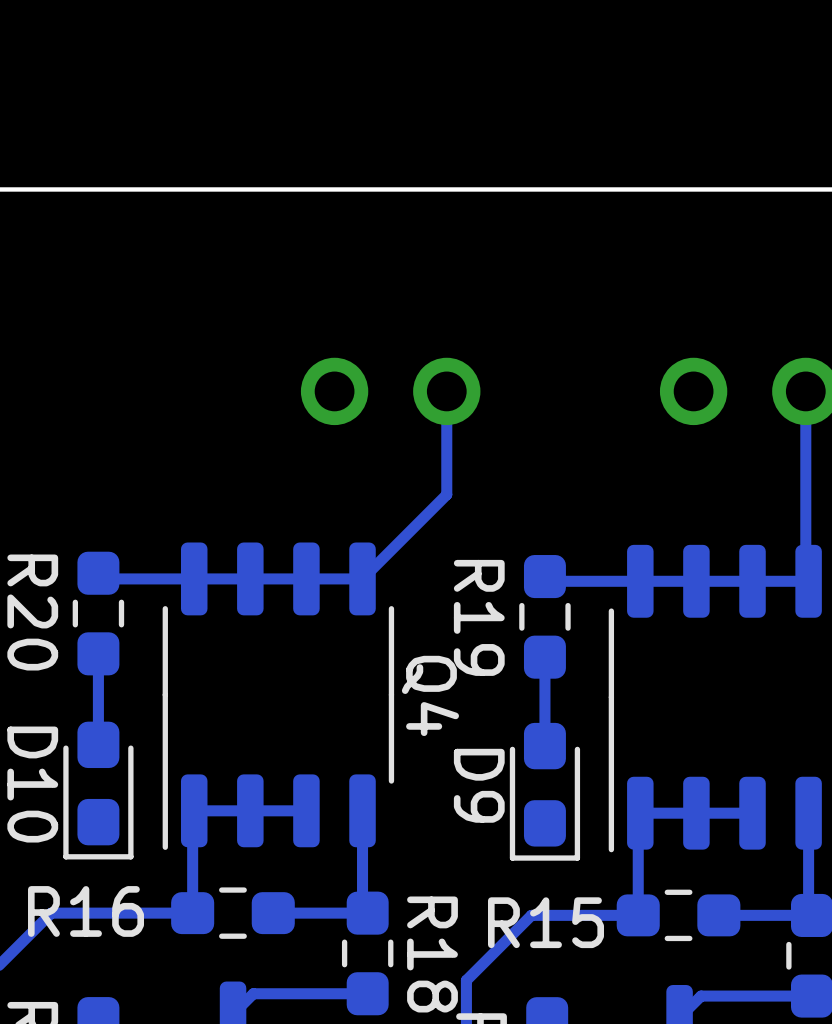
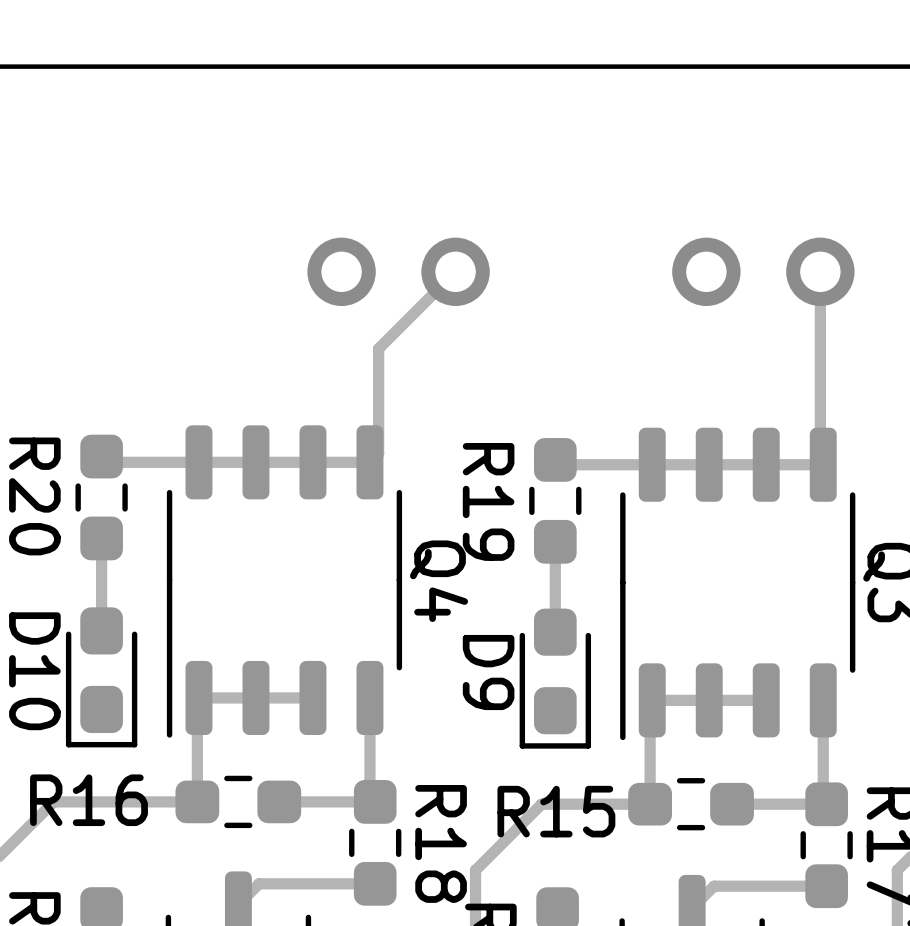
track: (446, 391) (446, 494) (371, 570) -> (455, 271) (378, 348) (378, 453)

